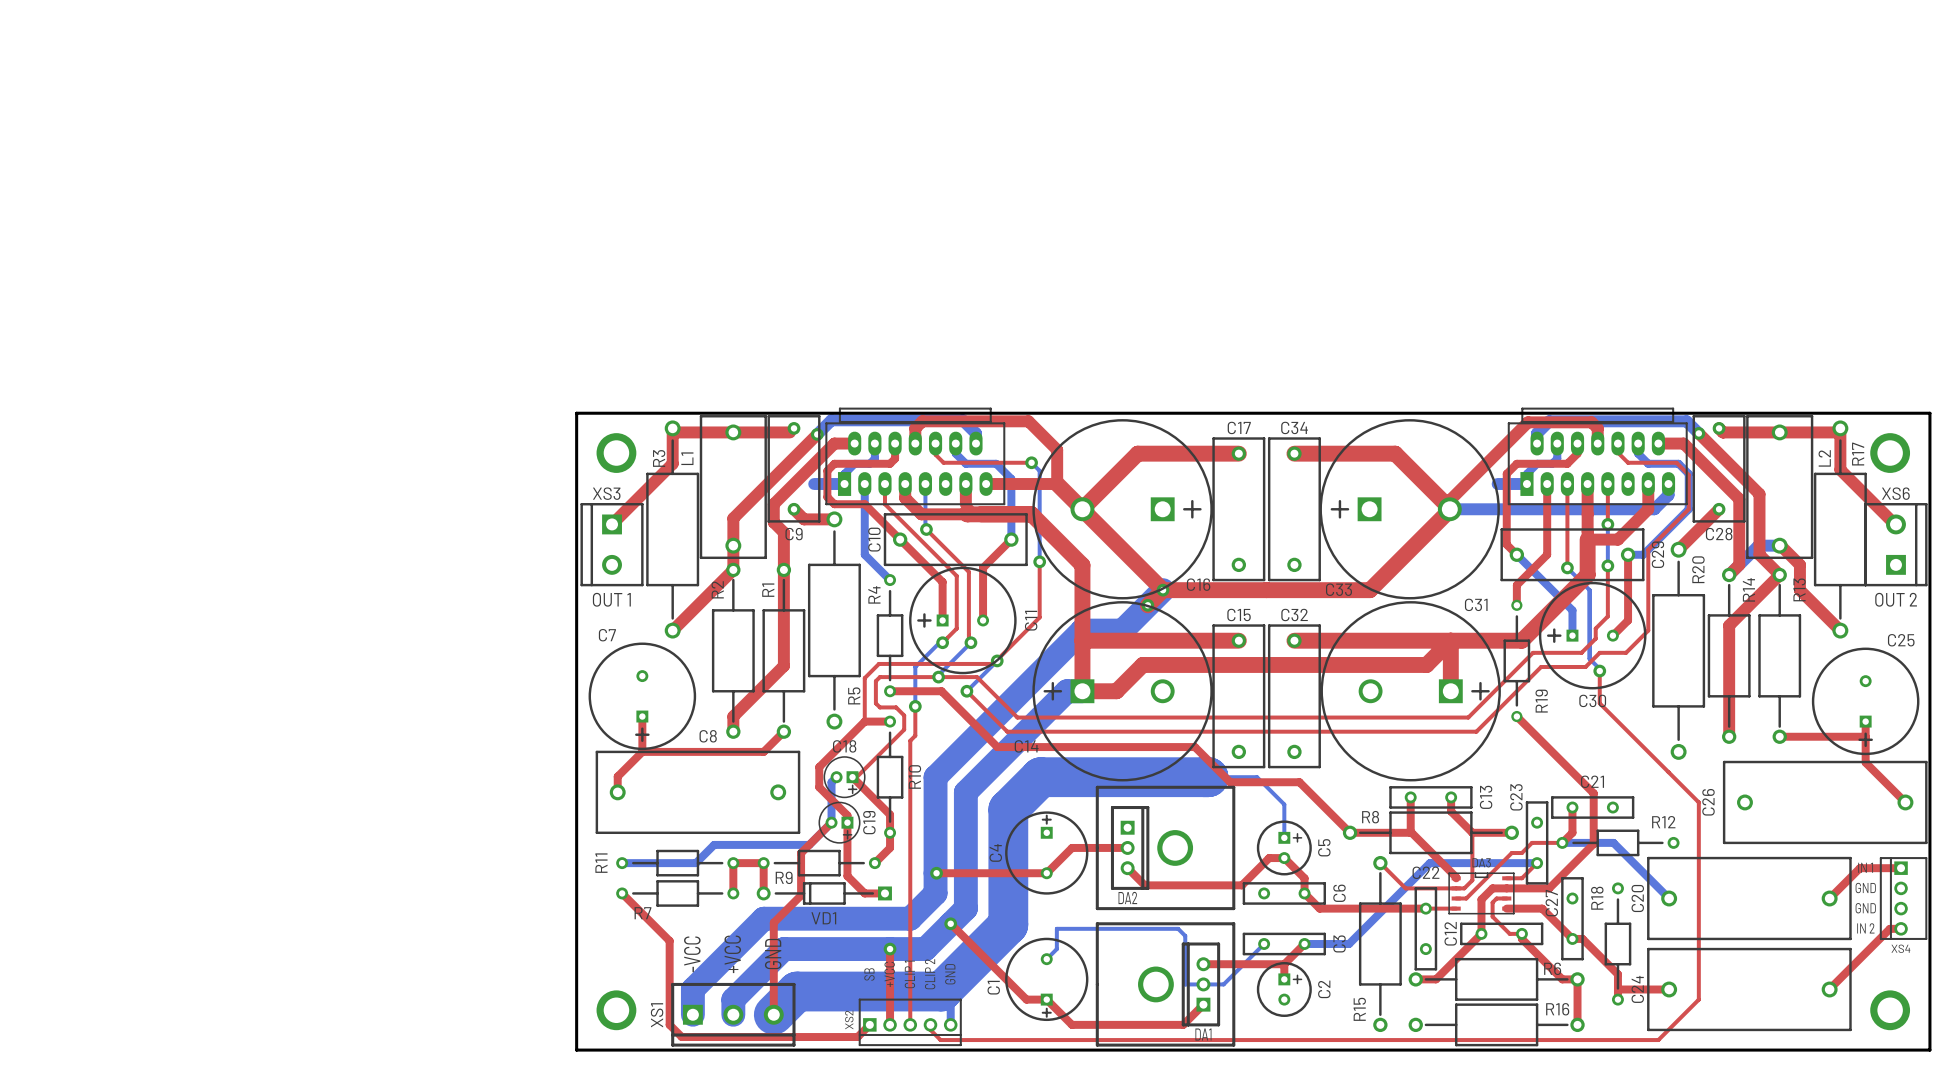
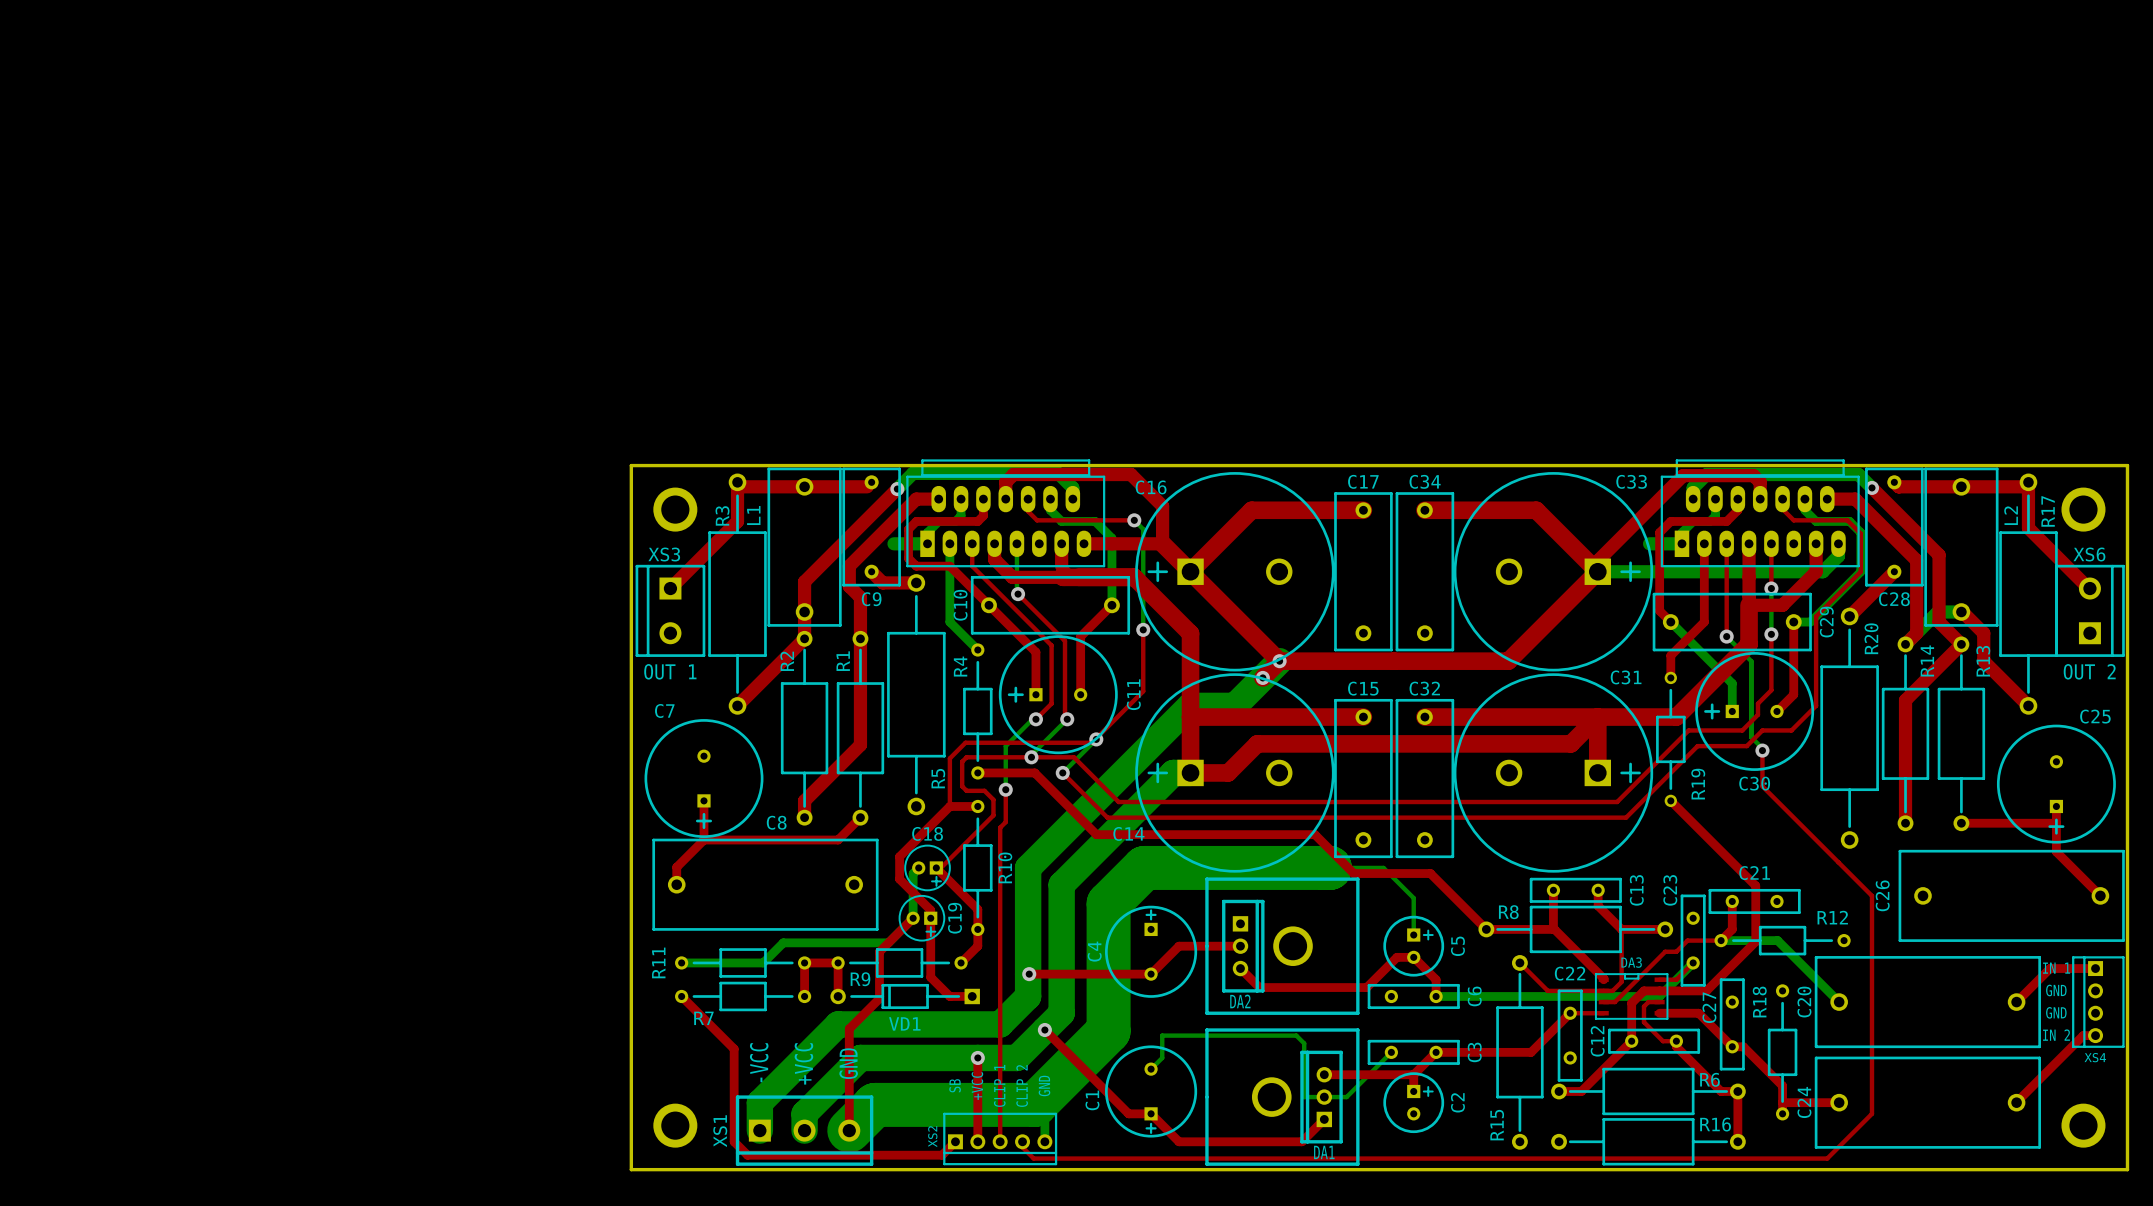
C16 rotation: 0° (1122, 509) -> 180° (1234, 571)
C33 rotation: 0° (1409, 509) -> 180° (1553, 571)
bottom track: (1537, 863) (1429, 863) (1349, 944) (1304, 944) -> (1693, 962) (1659, 996) (1436, 996)
top track: (1304, 893) (1319, 908) (1425, 908) -> (1436, 1052) (1531, 1052) (1570, 1013)

